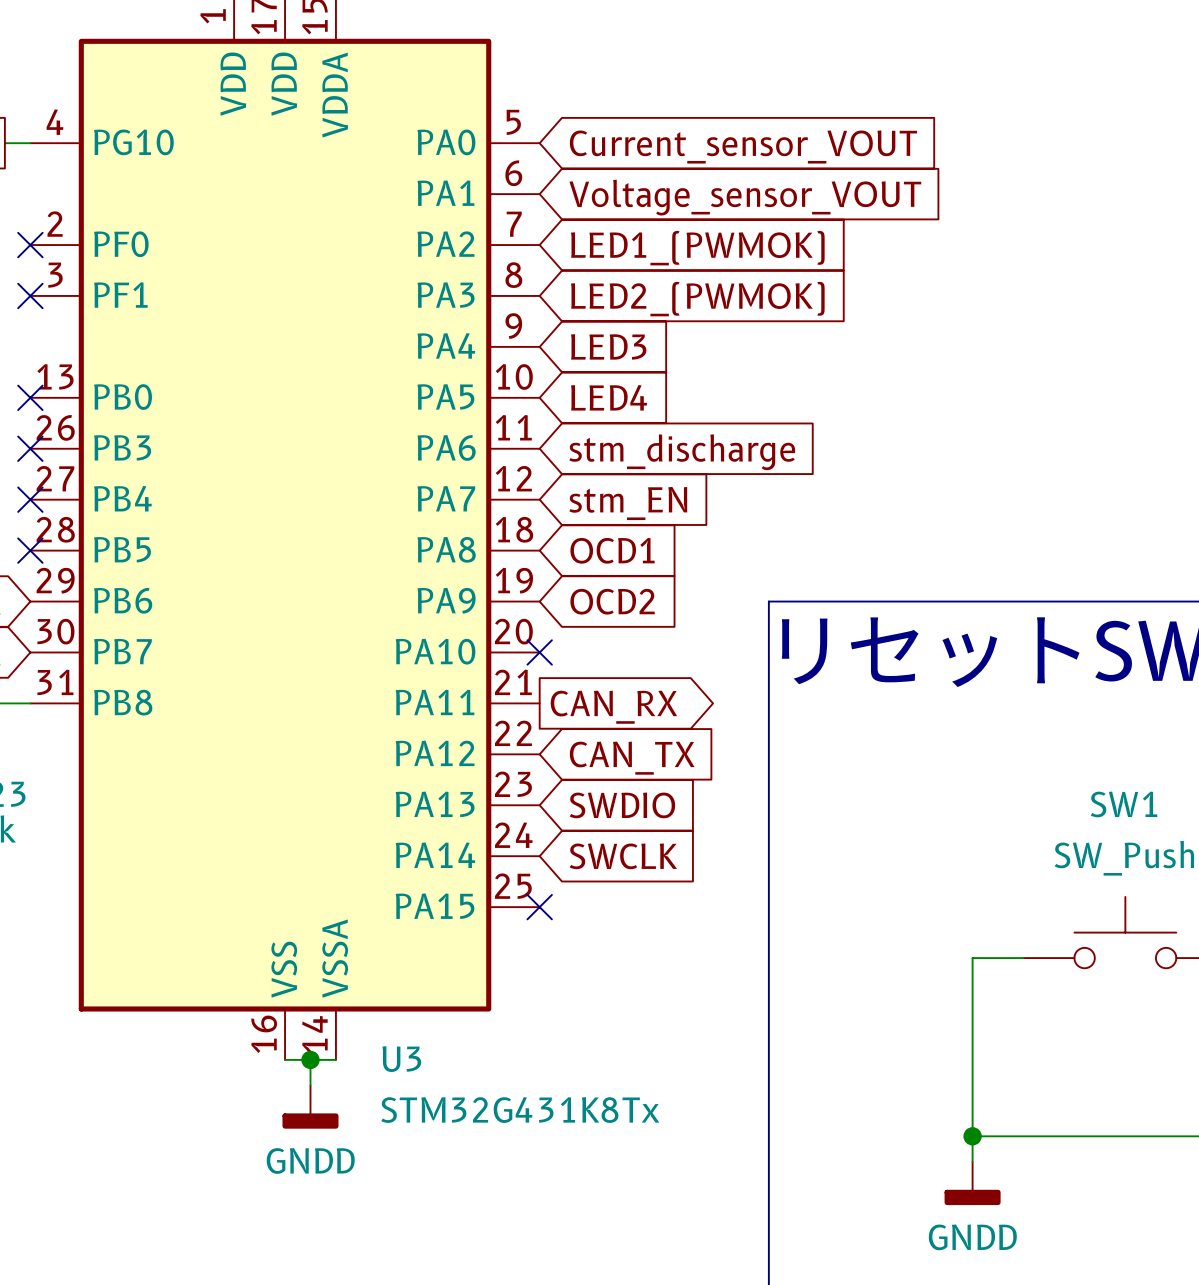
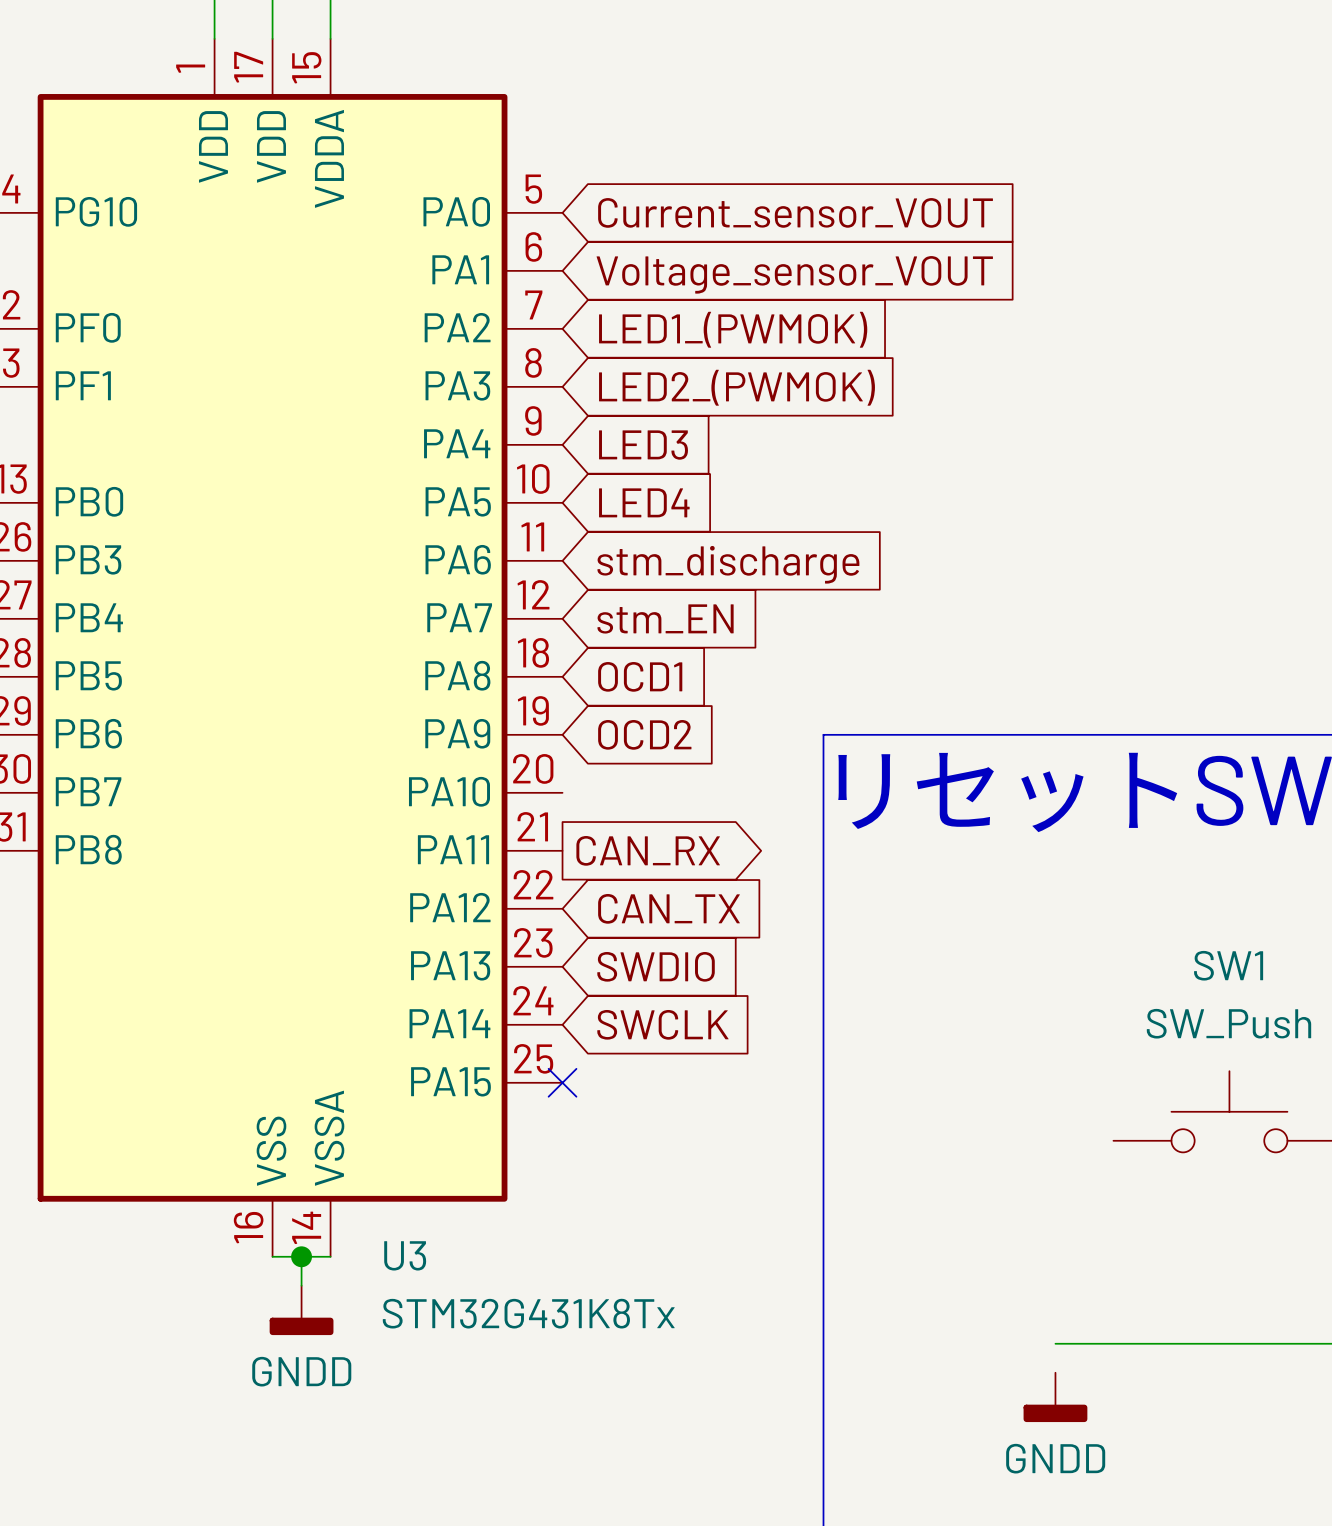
no-connect mark: (539, 652) -> none
wire: (1023, 958) (972, 958) (972, 1161) -> none
junction: (972, 1136) -> none

